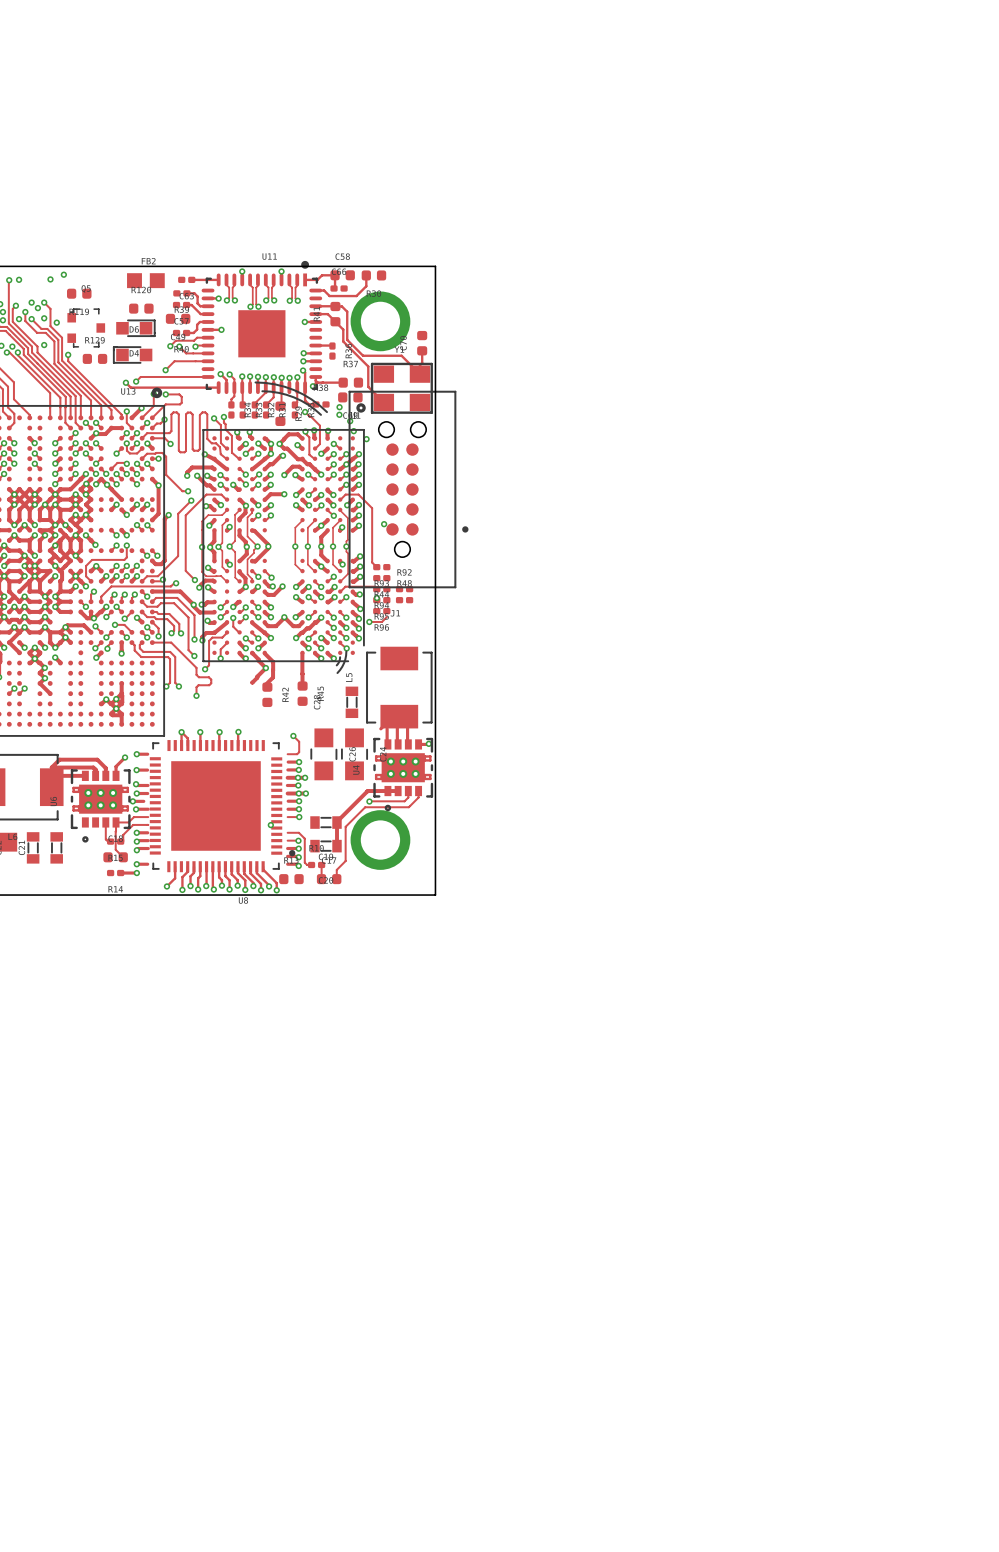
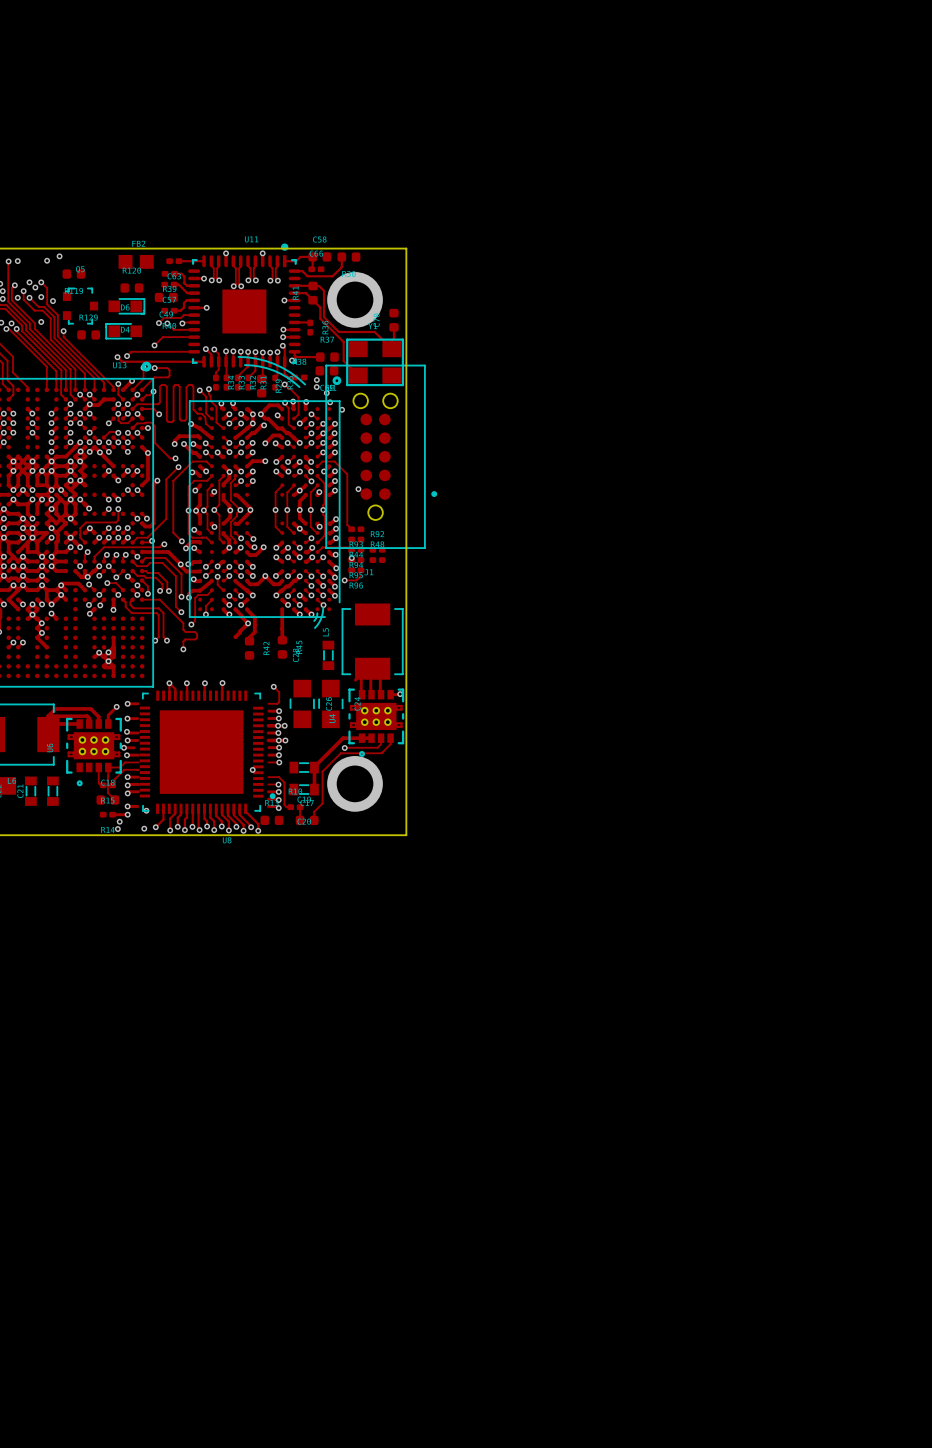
via: none -> (146, 810)
via: none -> (119, 821)
via: none -> (117, 829)
via: none -> (144, 828)

